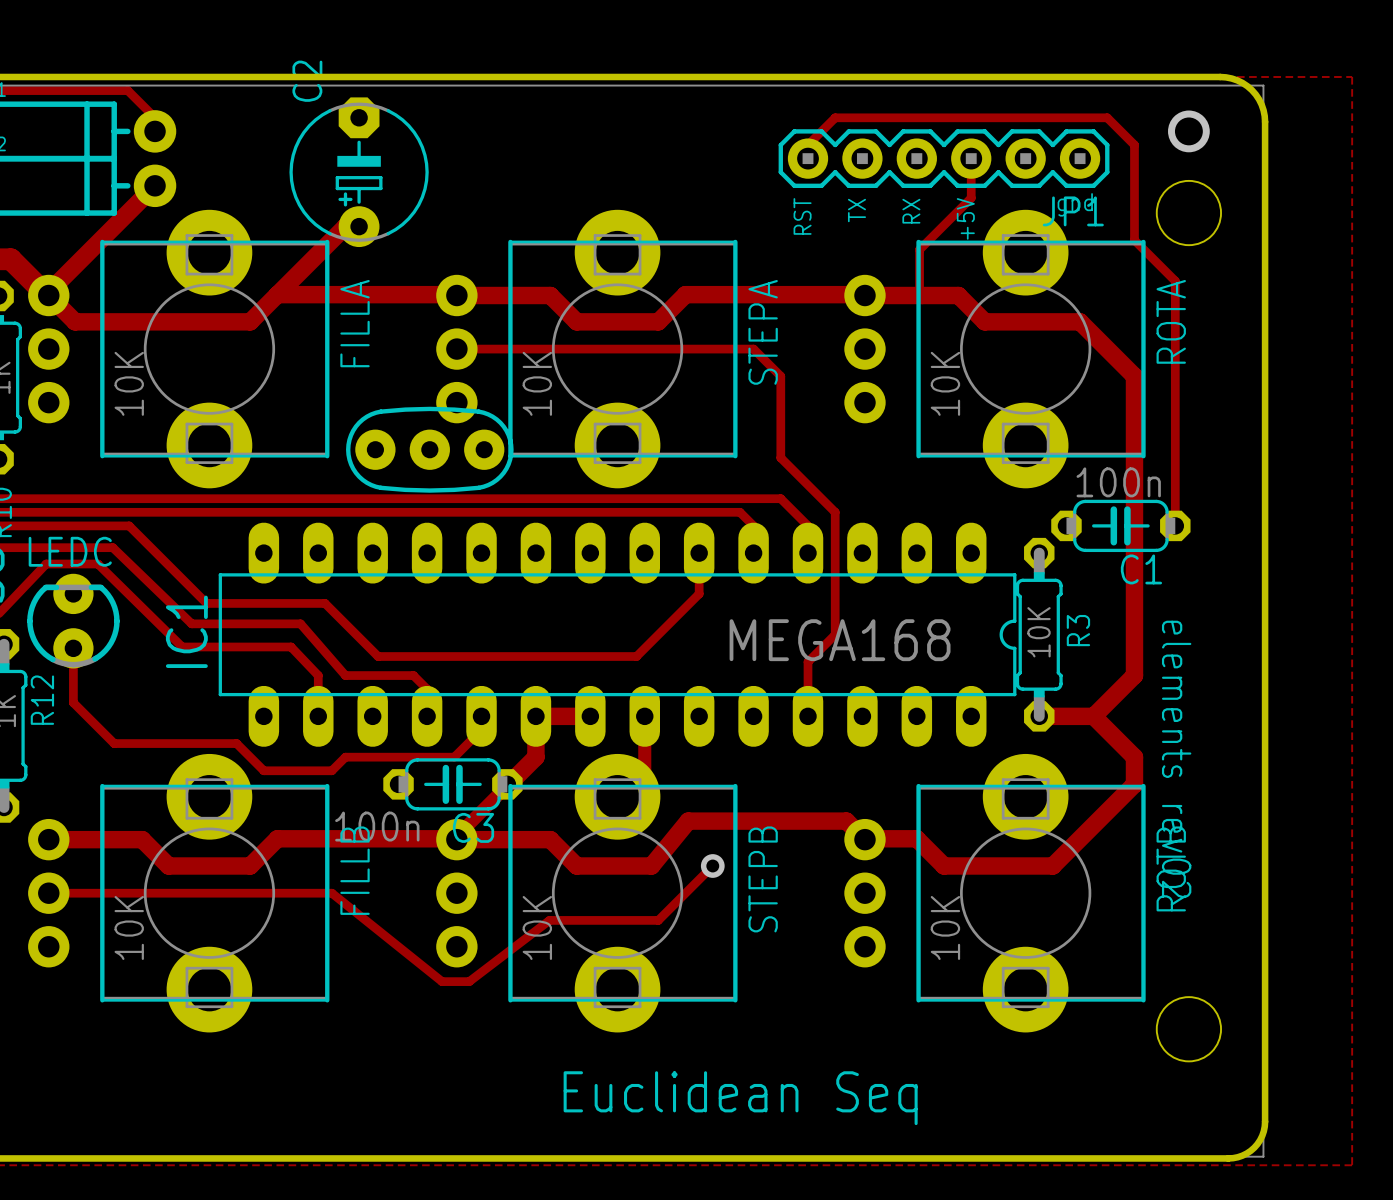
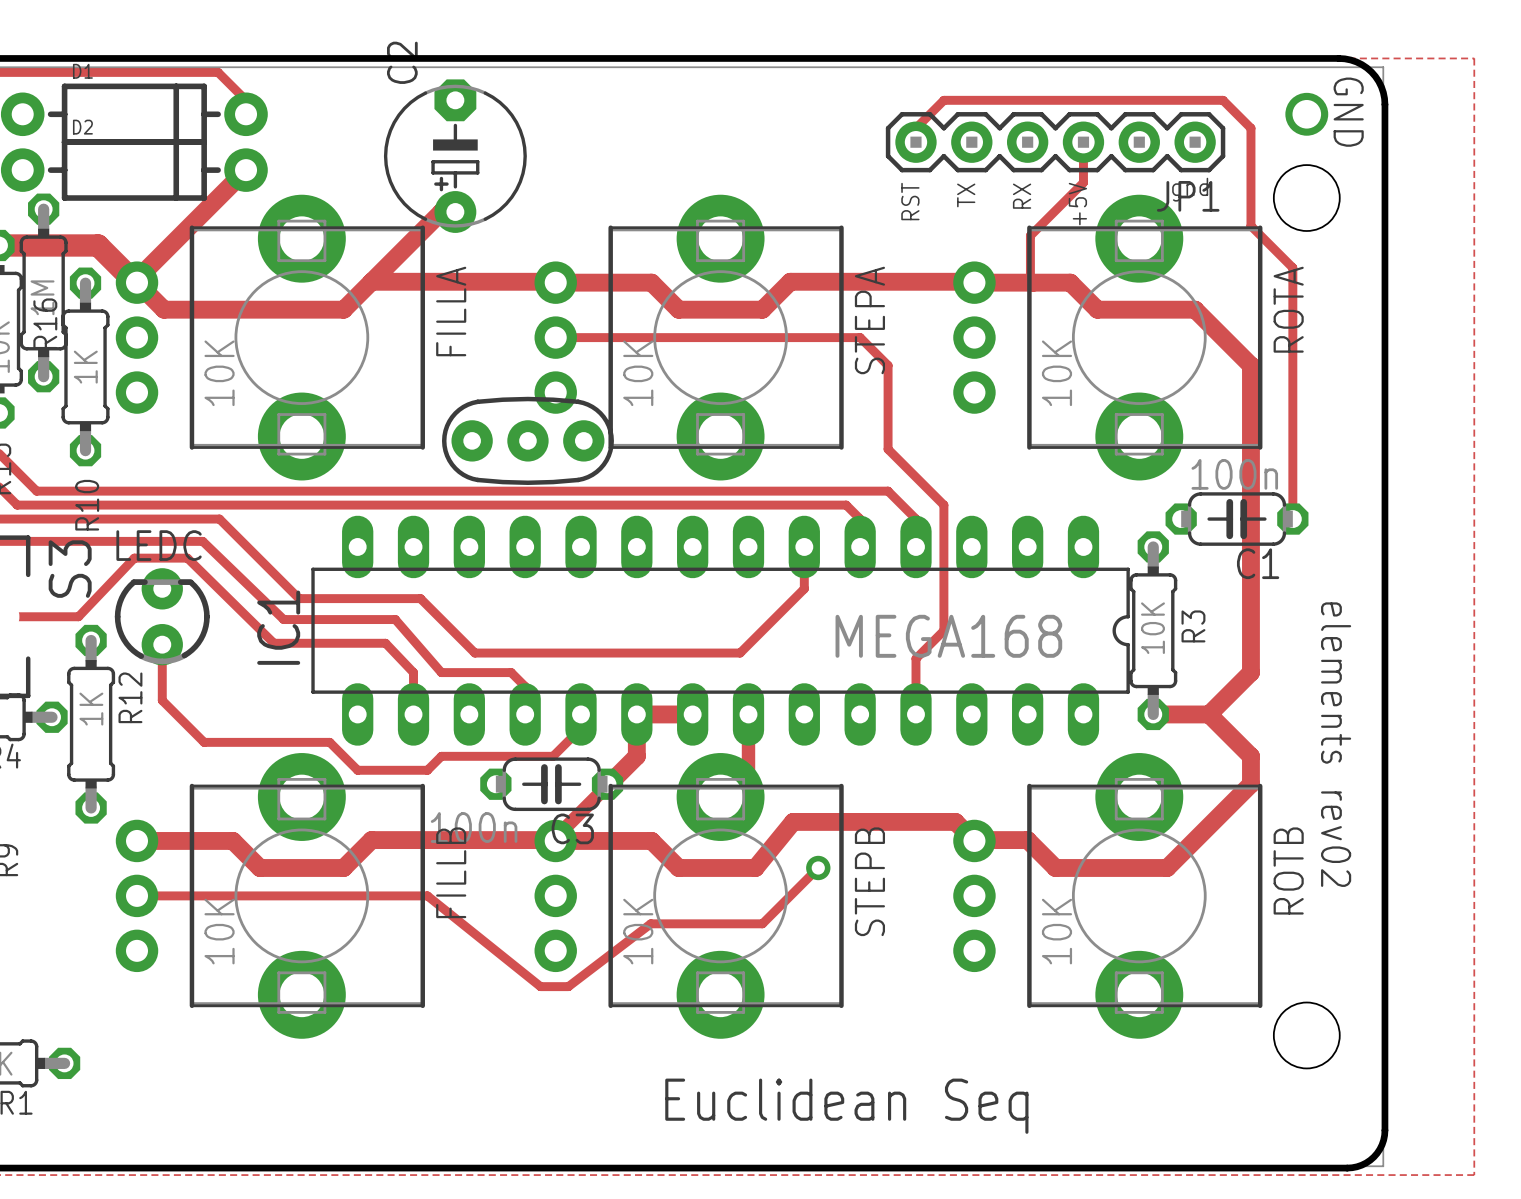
text: none -> GND (1348, 112)
text position: elements rev02 (1176, 759) -> elements rev02 (1336, 744)

